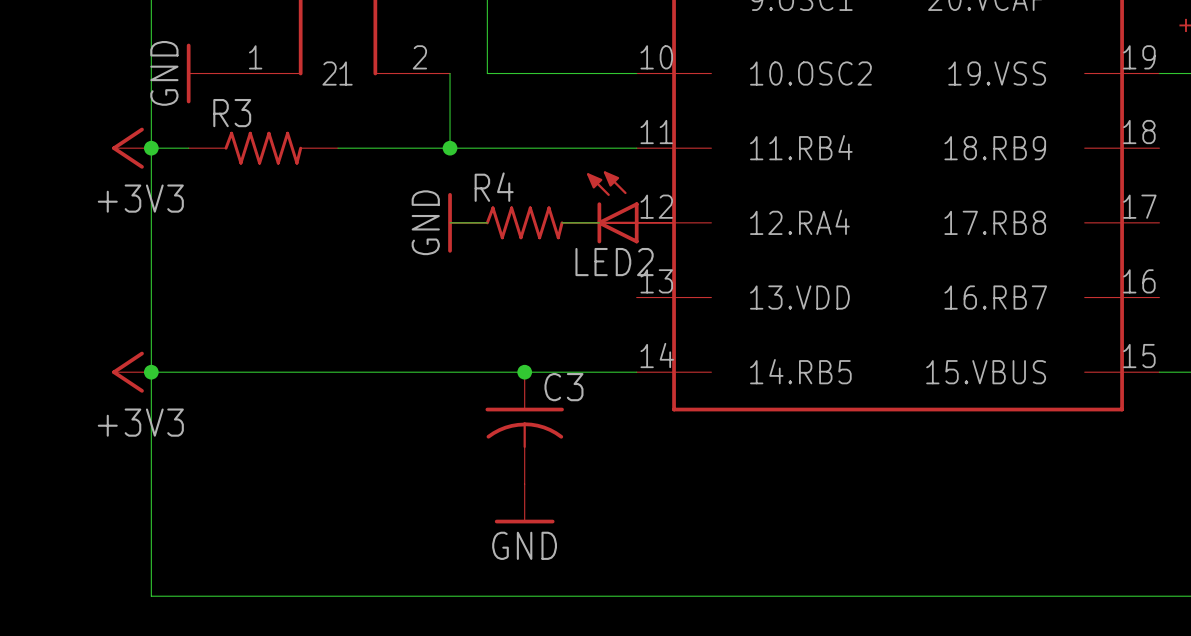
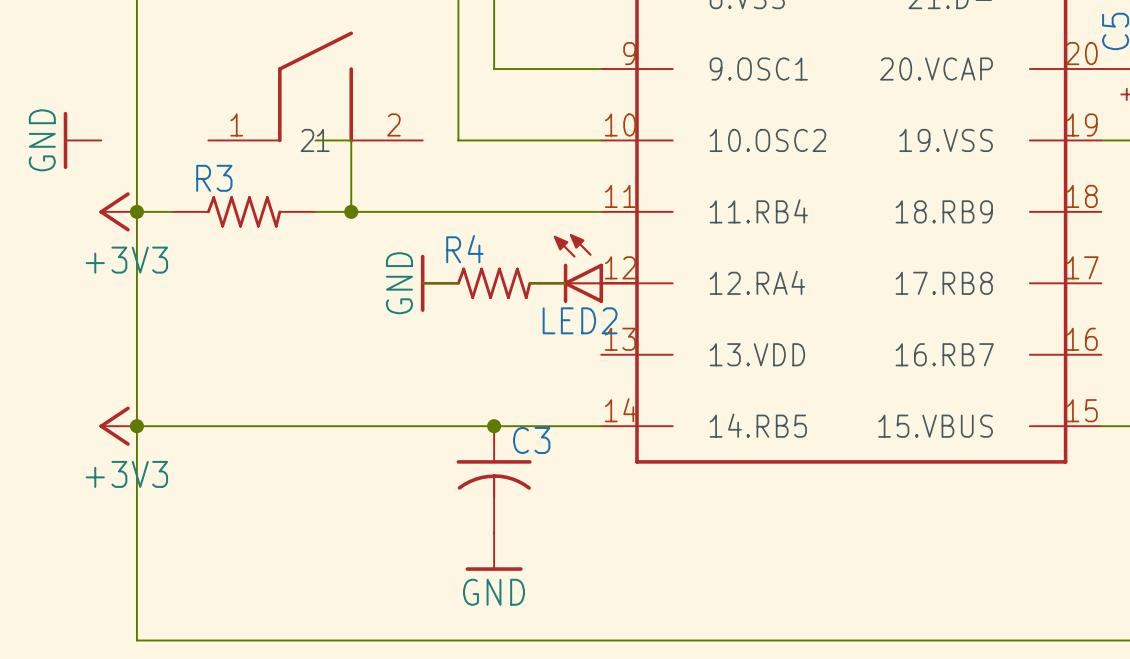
power symbol position: GND (206, 73) -> GND (82, 140)
wire: none -> (315, 140) (351, 140) (351, 211)
wire: (450, 73) (450, 148) -> none
junction position: (450, 148) -> (351, 211)

